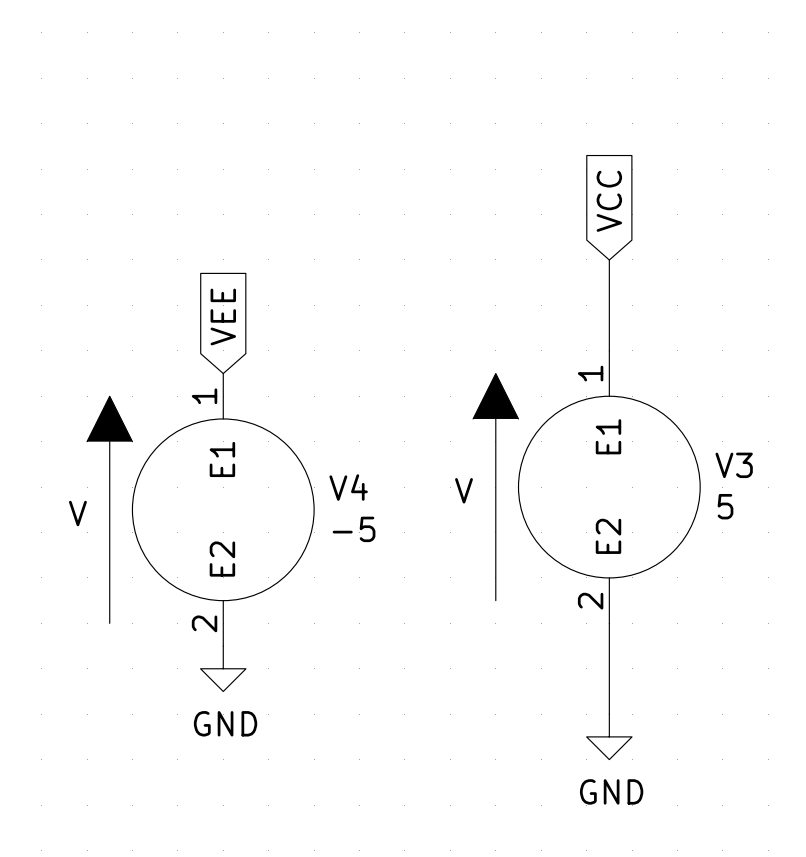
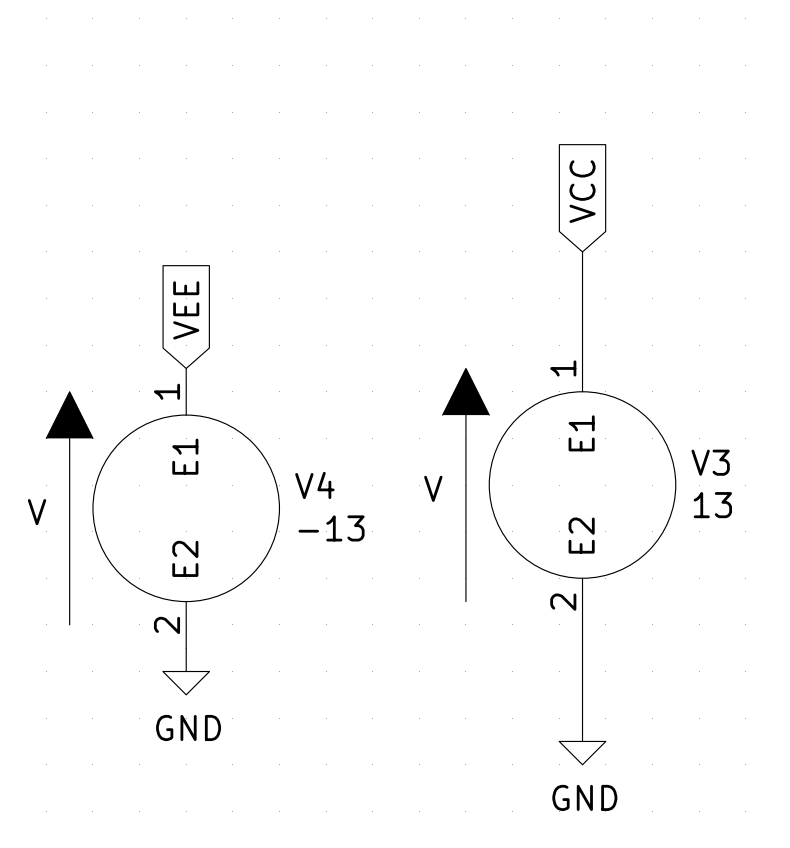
V3 value: 5 (725, 506) -> 13 (712, 505)
V4 value: -5 (354, 529) -> -13 (331, 528)

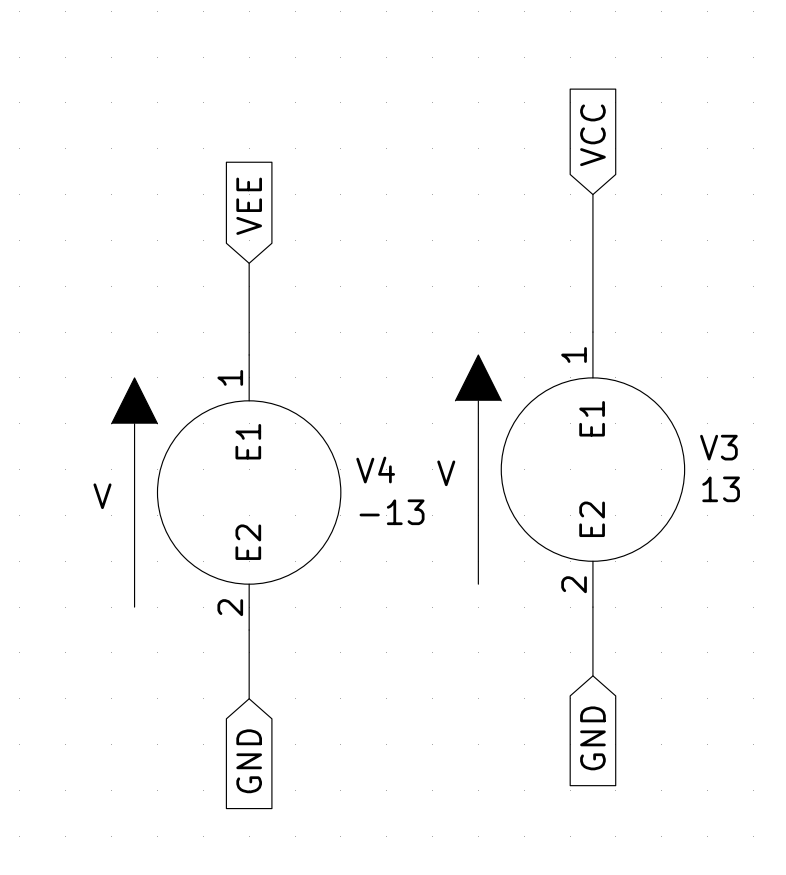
wire: none -> (592, 194) (592, 286)
global label position: VCC (582, 191) -> VCC (592, 135)
wire: none -> (249, 263) (249, 354)
global label position: VEE (186, 310) -> VEE (249, 206)
V3 position: (559, 485) -> (570, 469)
V4 position: (162, 508) -> (226, 492)
wire: (582, 648) (582, 718) -> (249, 630) (249, 698)
power symbol: GND (186, 671) -> none
global label: none -> GND (592, 738)
global label: none -> GND (249, 761)
power symbol: GND (582, 741) -> none

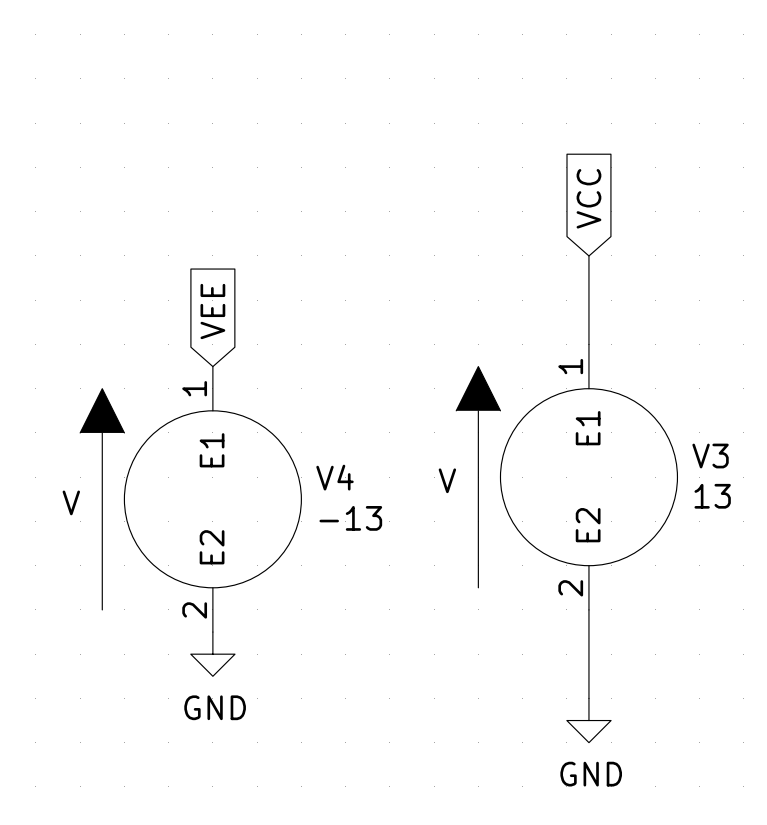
global label position: VCC (592, 135) -> VCC (588, 198)
wire: (592, 194) (592, 286) -> none
global label position: VEE (249, 206) -> VEE (212, 311)
wire: (249, 263) (249, 354) -> none
V3 position: (570, 469) -> (566, 477)
V4 position: (226, 492) -> (190, 499)
wire: (249, 630) (249, 698) -> (588, 632) (588, 698)
power symbol: none -> GND (212, 654)
global label: GND (592, 738) -> none
global label: GND (249, 761) -> none
power symbol: none -> GND (588, 720)

